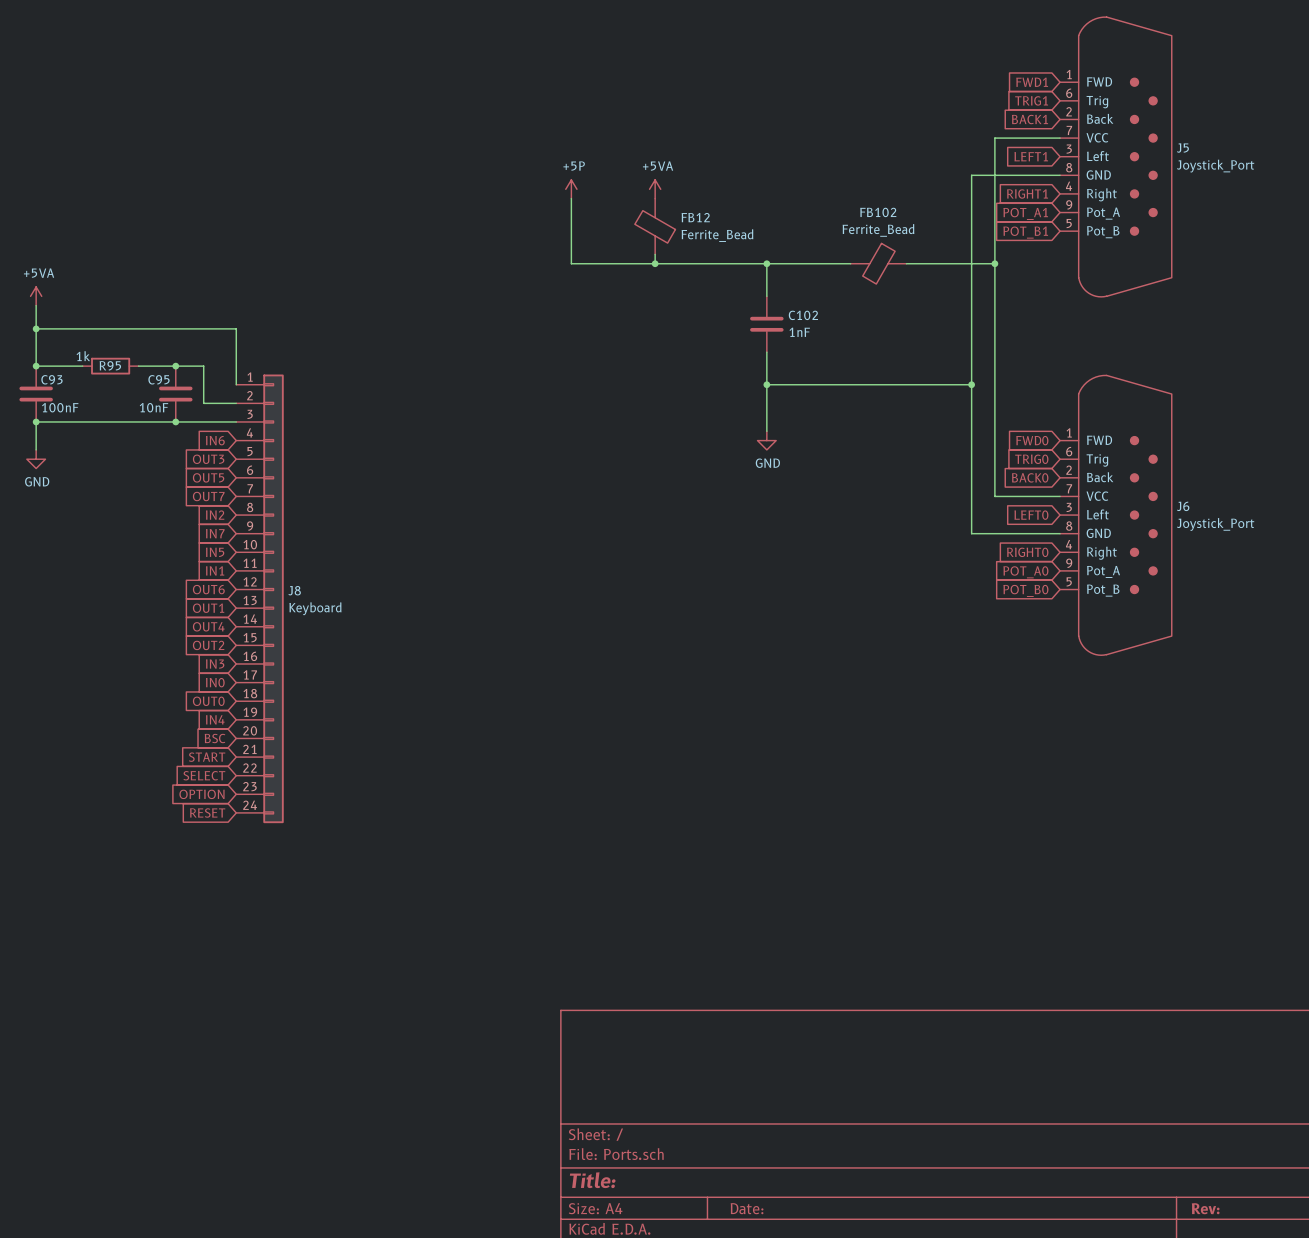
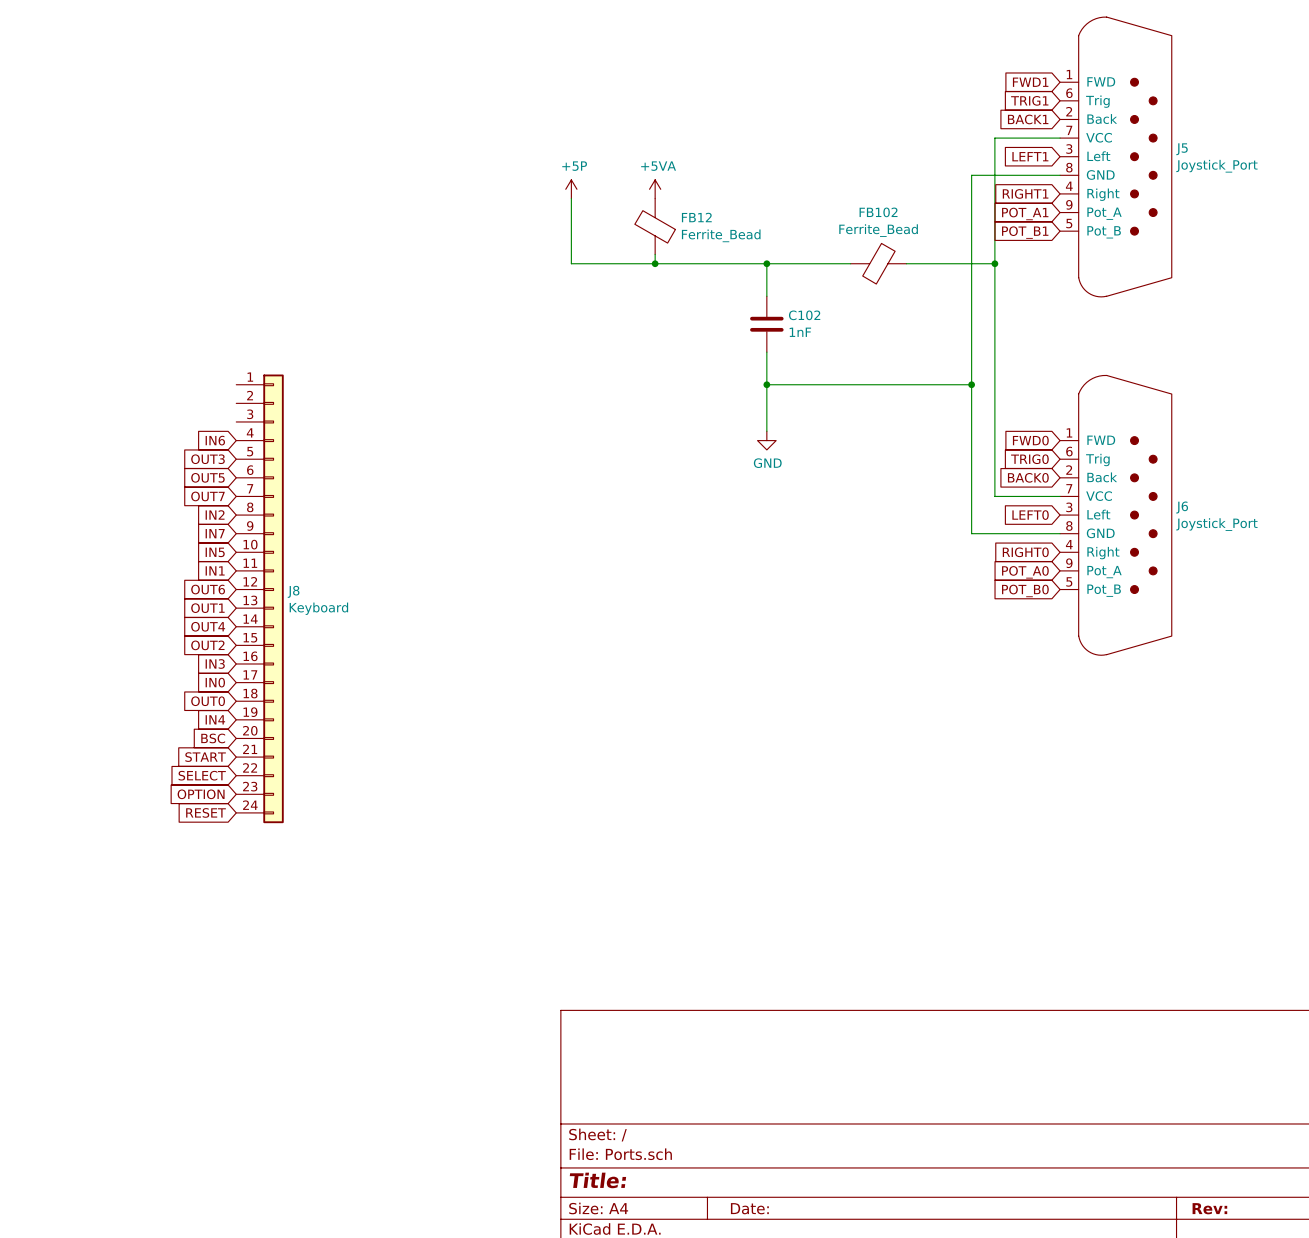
power symbol: +5VA (36, 296) -> none
wire: (36, 305) (36, 366) (82, 366) -> none
wire: (36, 328) (236, 328) (236, 384) -> none
junction: (36, 328) -> none
junction: (36, 366) -> none
R95: 1k (110, 366) -> none
wire: (138, 366) (203, 366) (203, 403) (236, 403) -> none
junction: (175, 366) -> none
C93: 100nF (36, 394) -> none
C95: 10nF (175, 394) -> none
junction: (36, 421) -> none
junction: (175, 421) -> none
wire: (236, 421) (36, 421) (36, 449) -> none
power symbol: GND (36, 459) -> none

